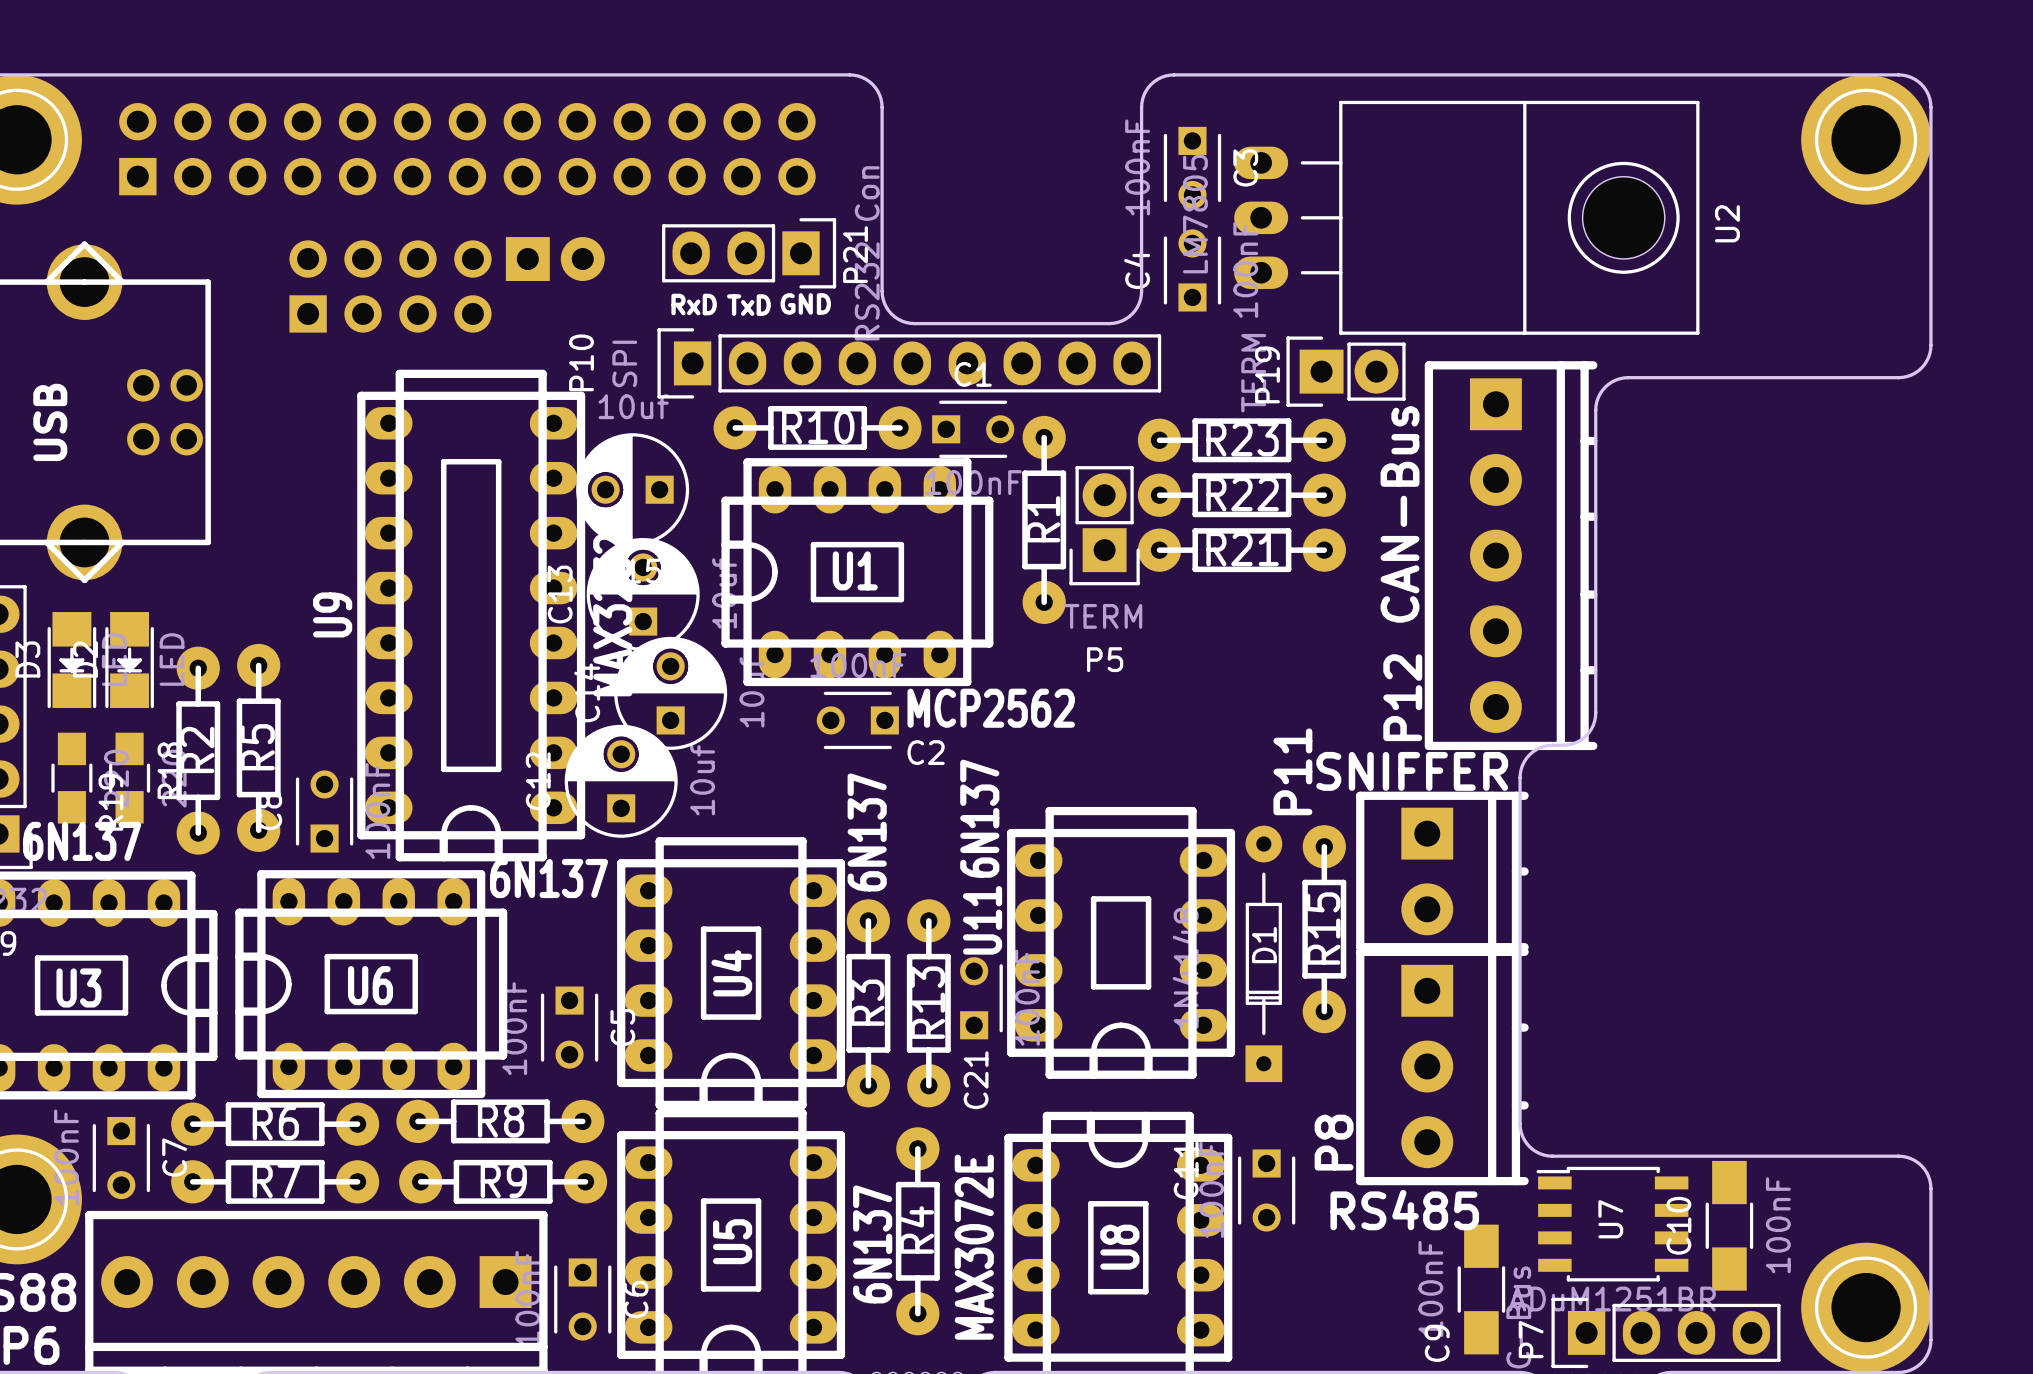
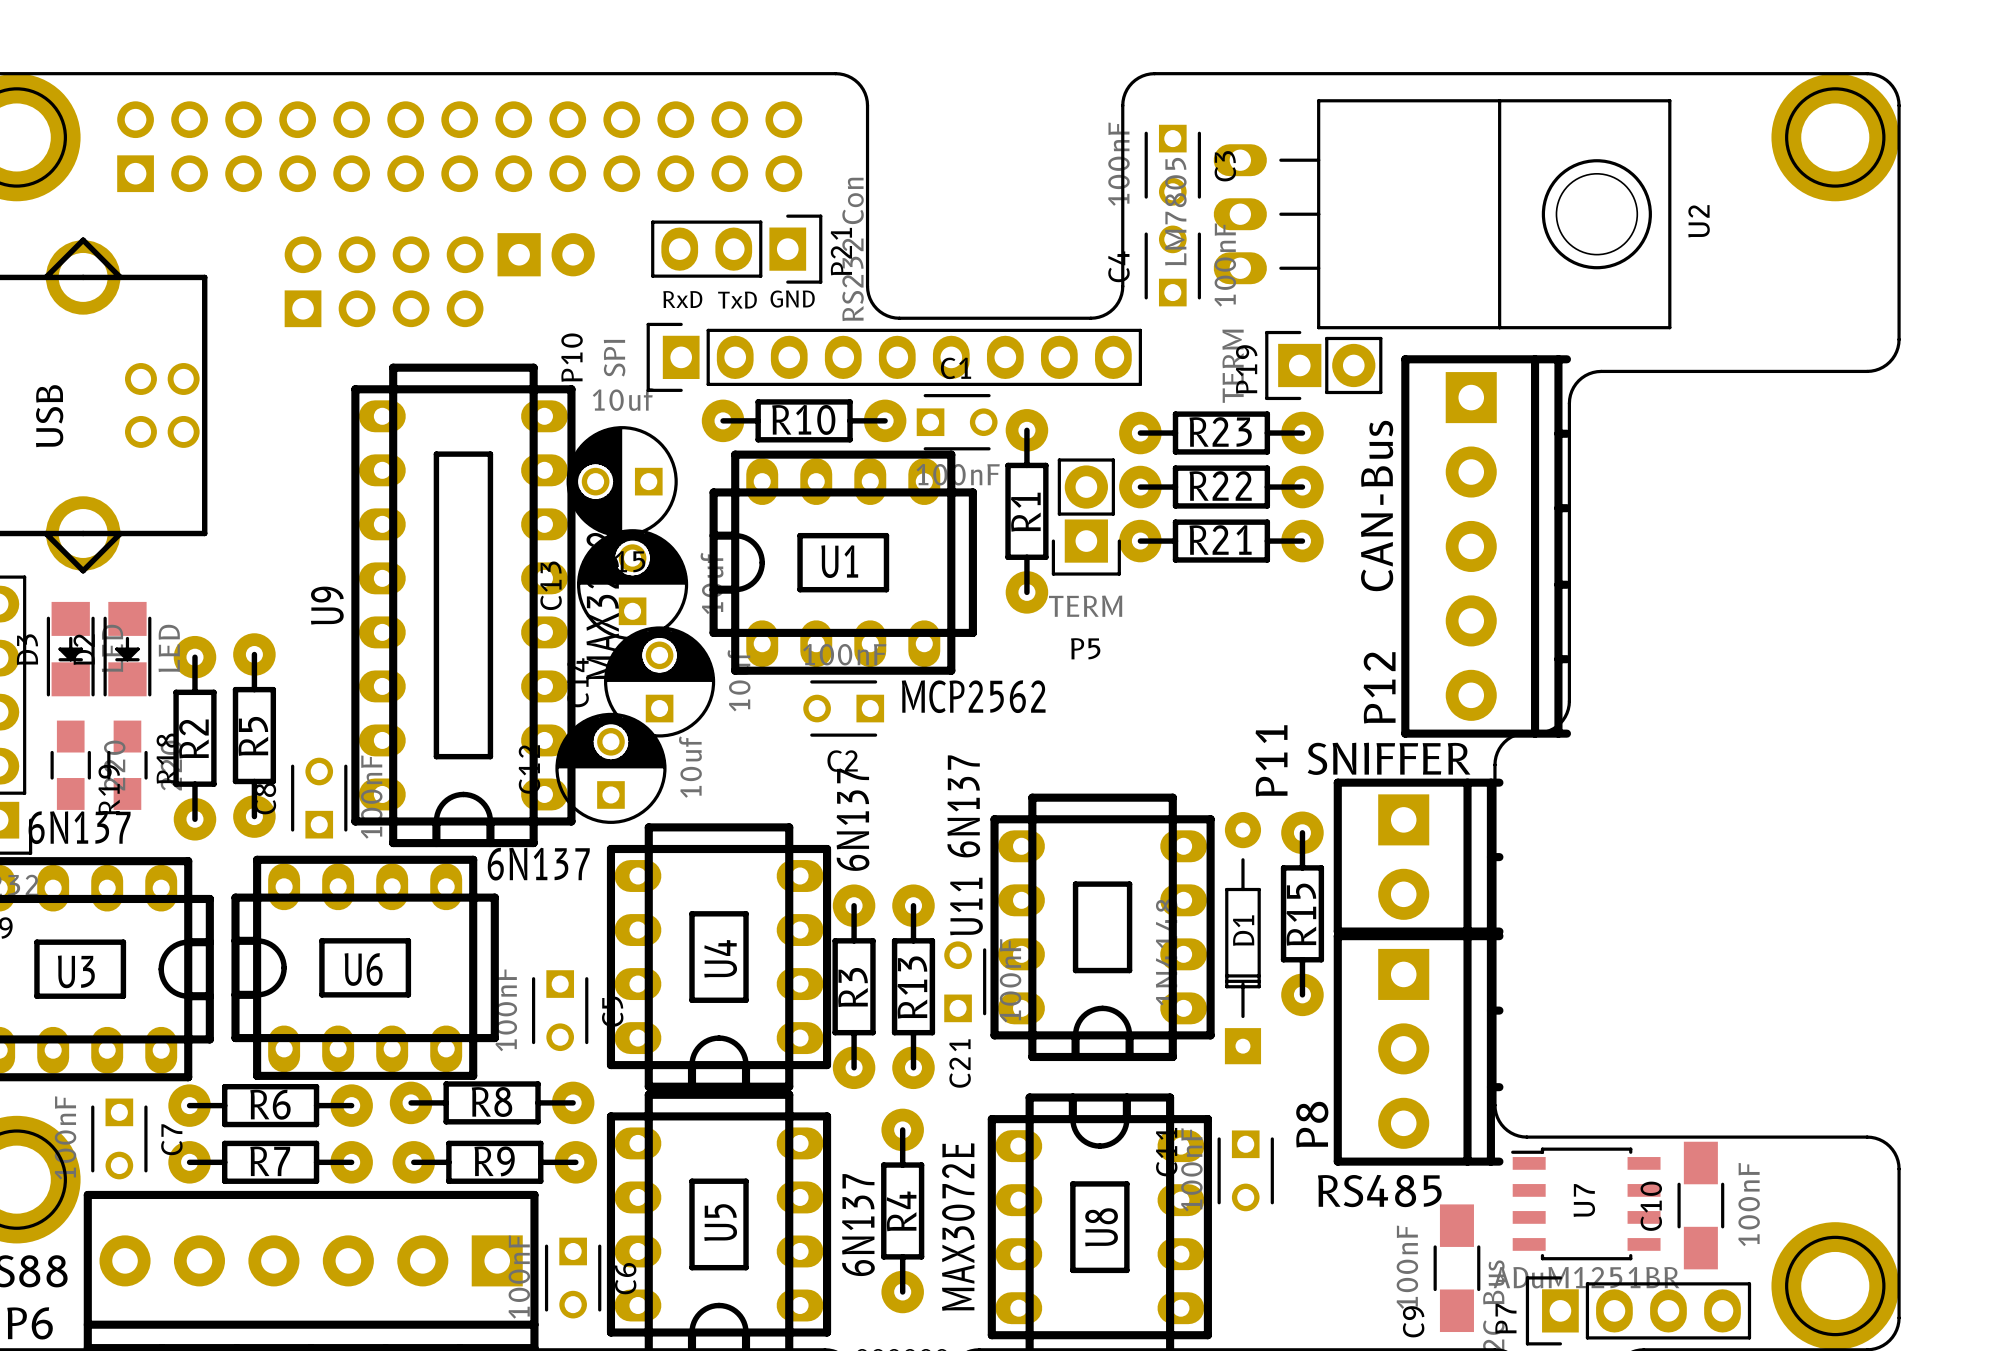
C2 name position: C2 (926, 752) -> C2 (842, 761)

